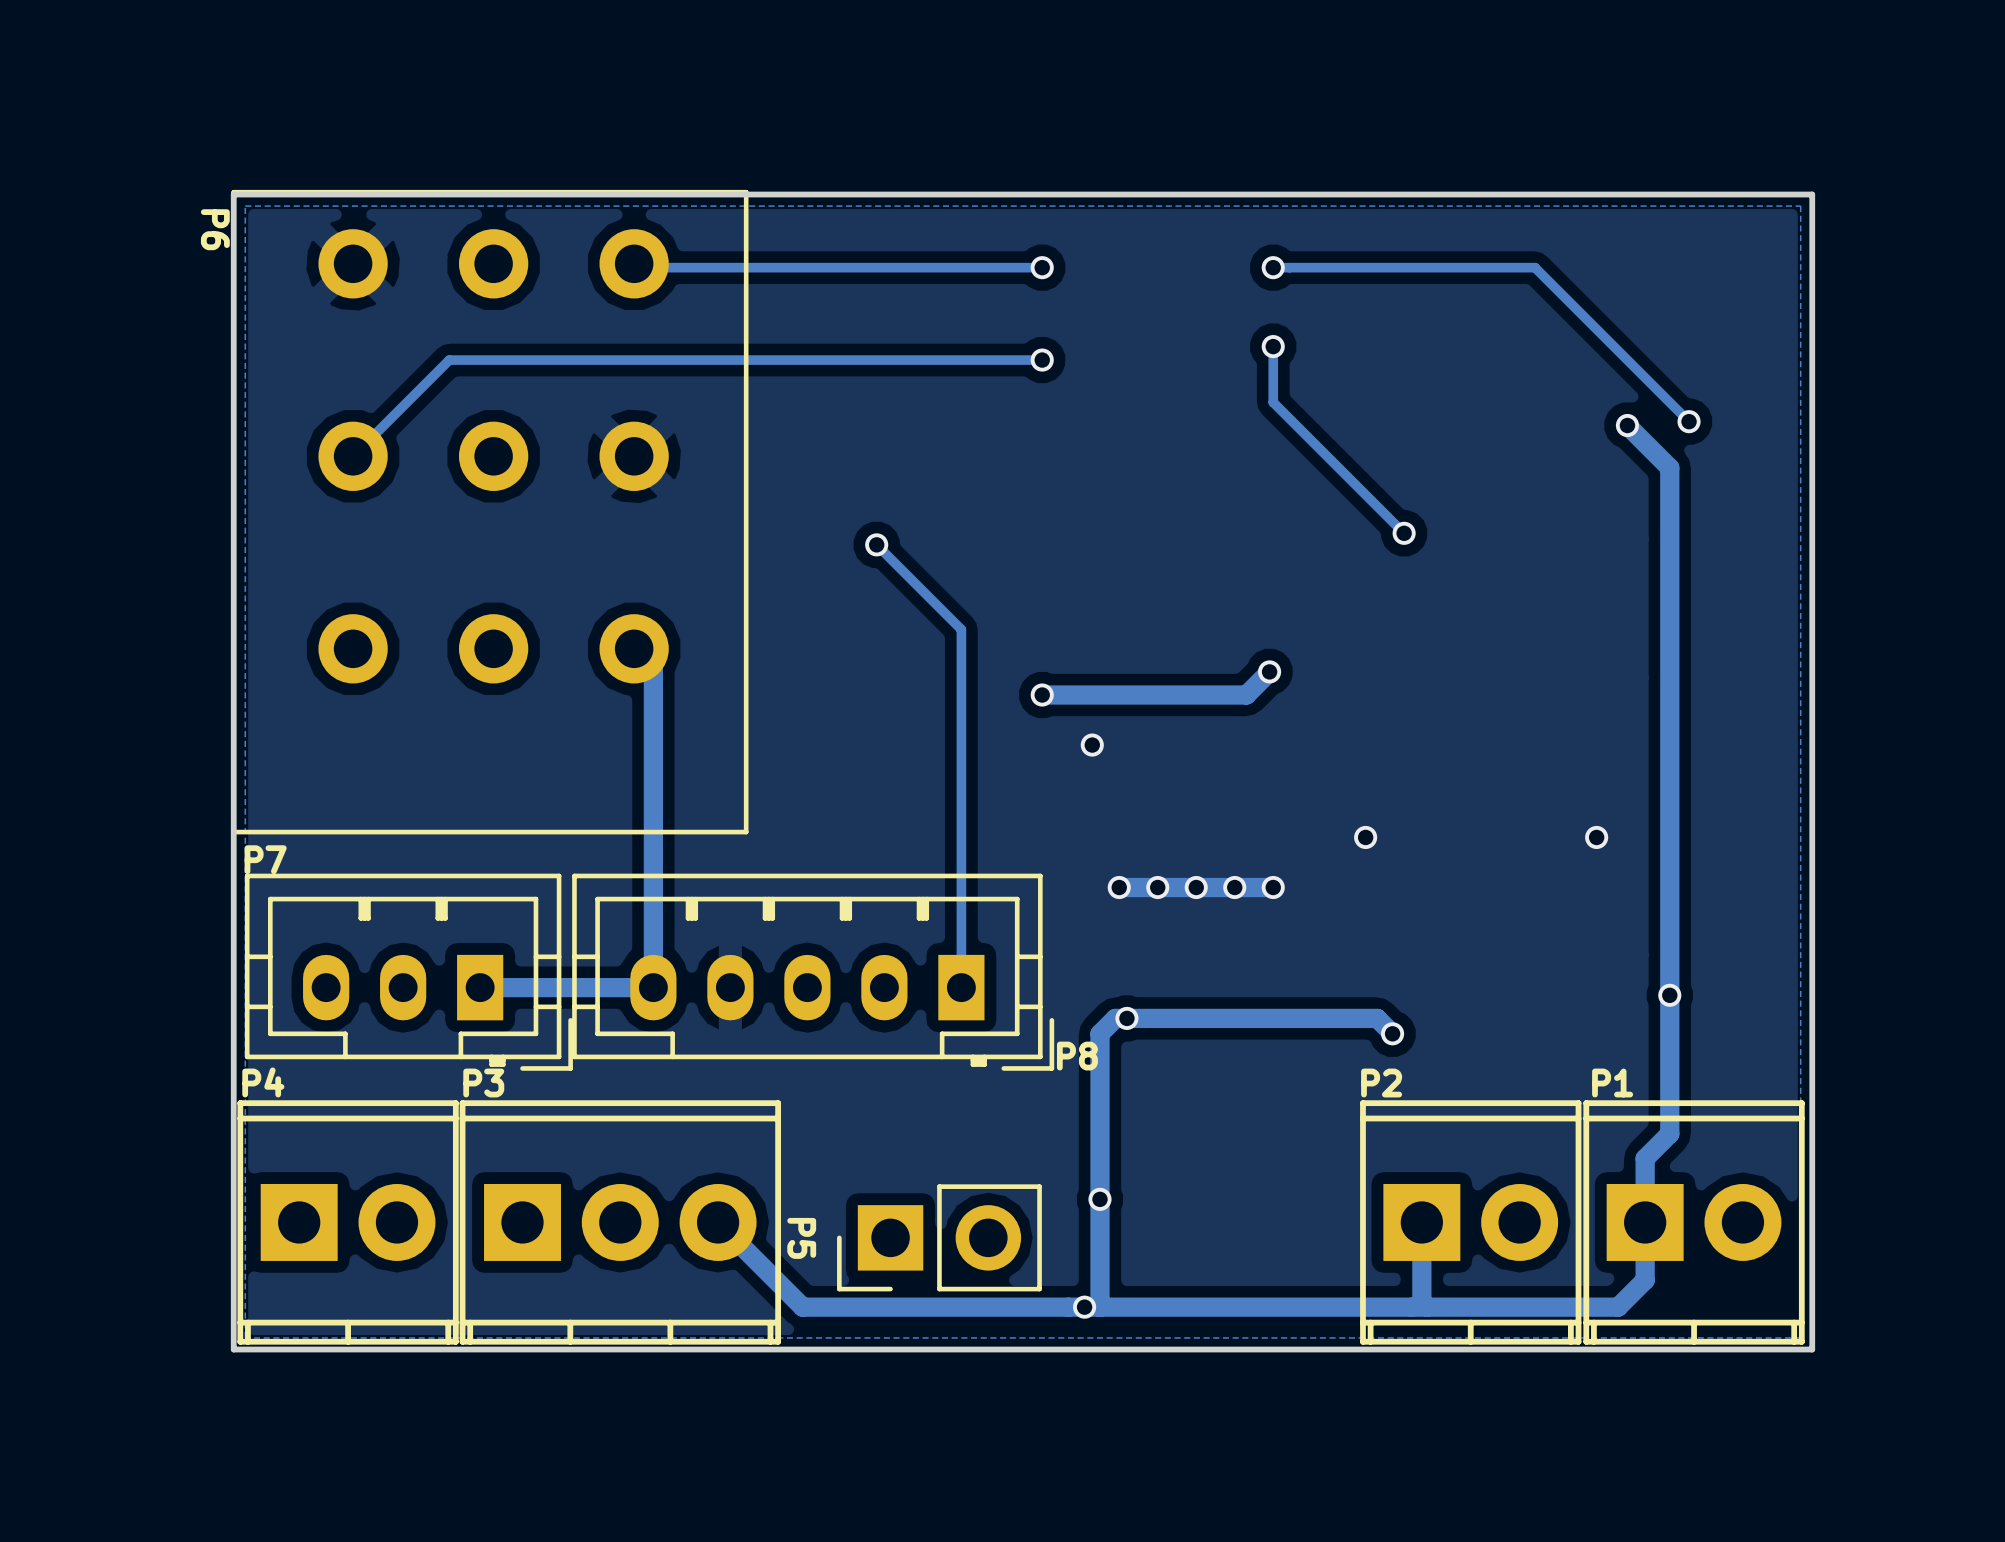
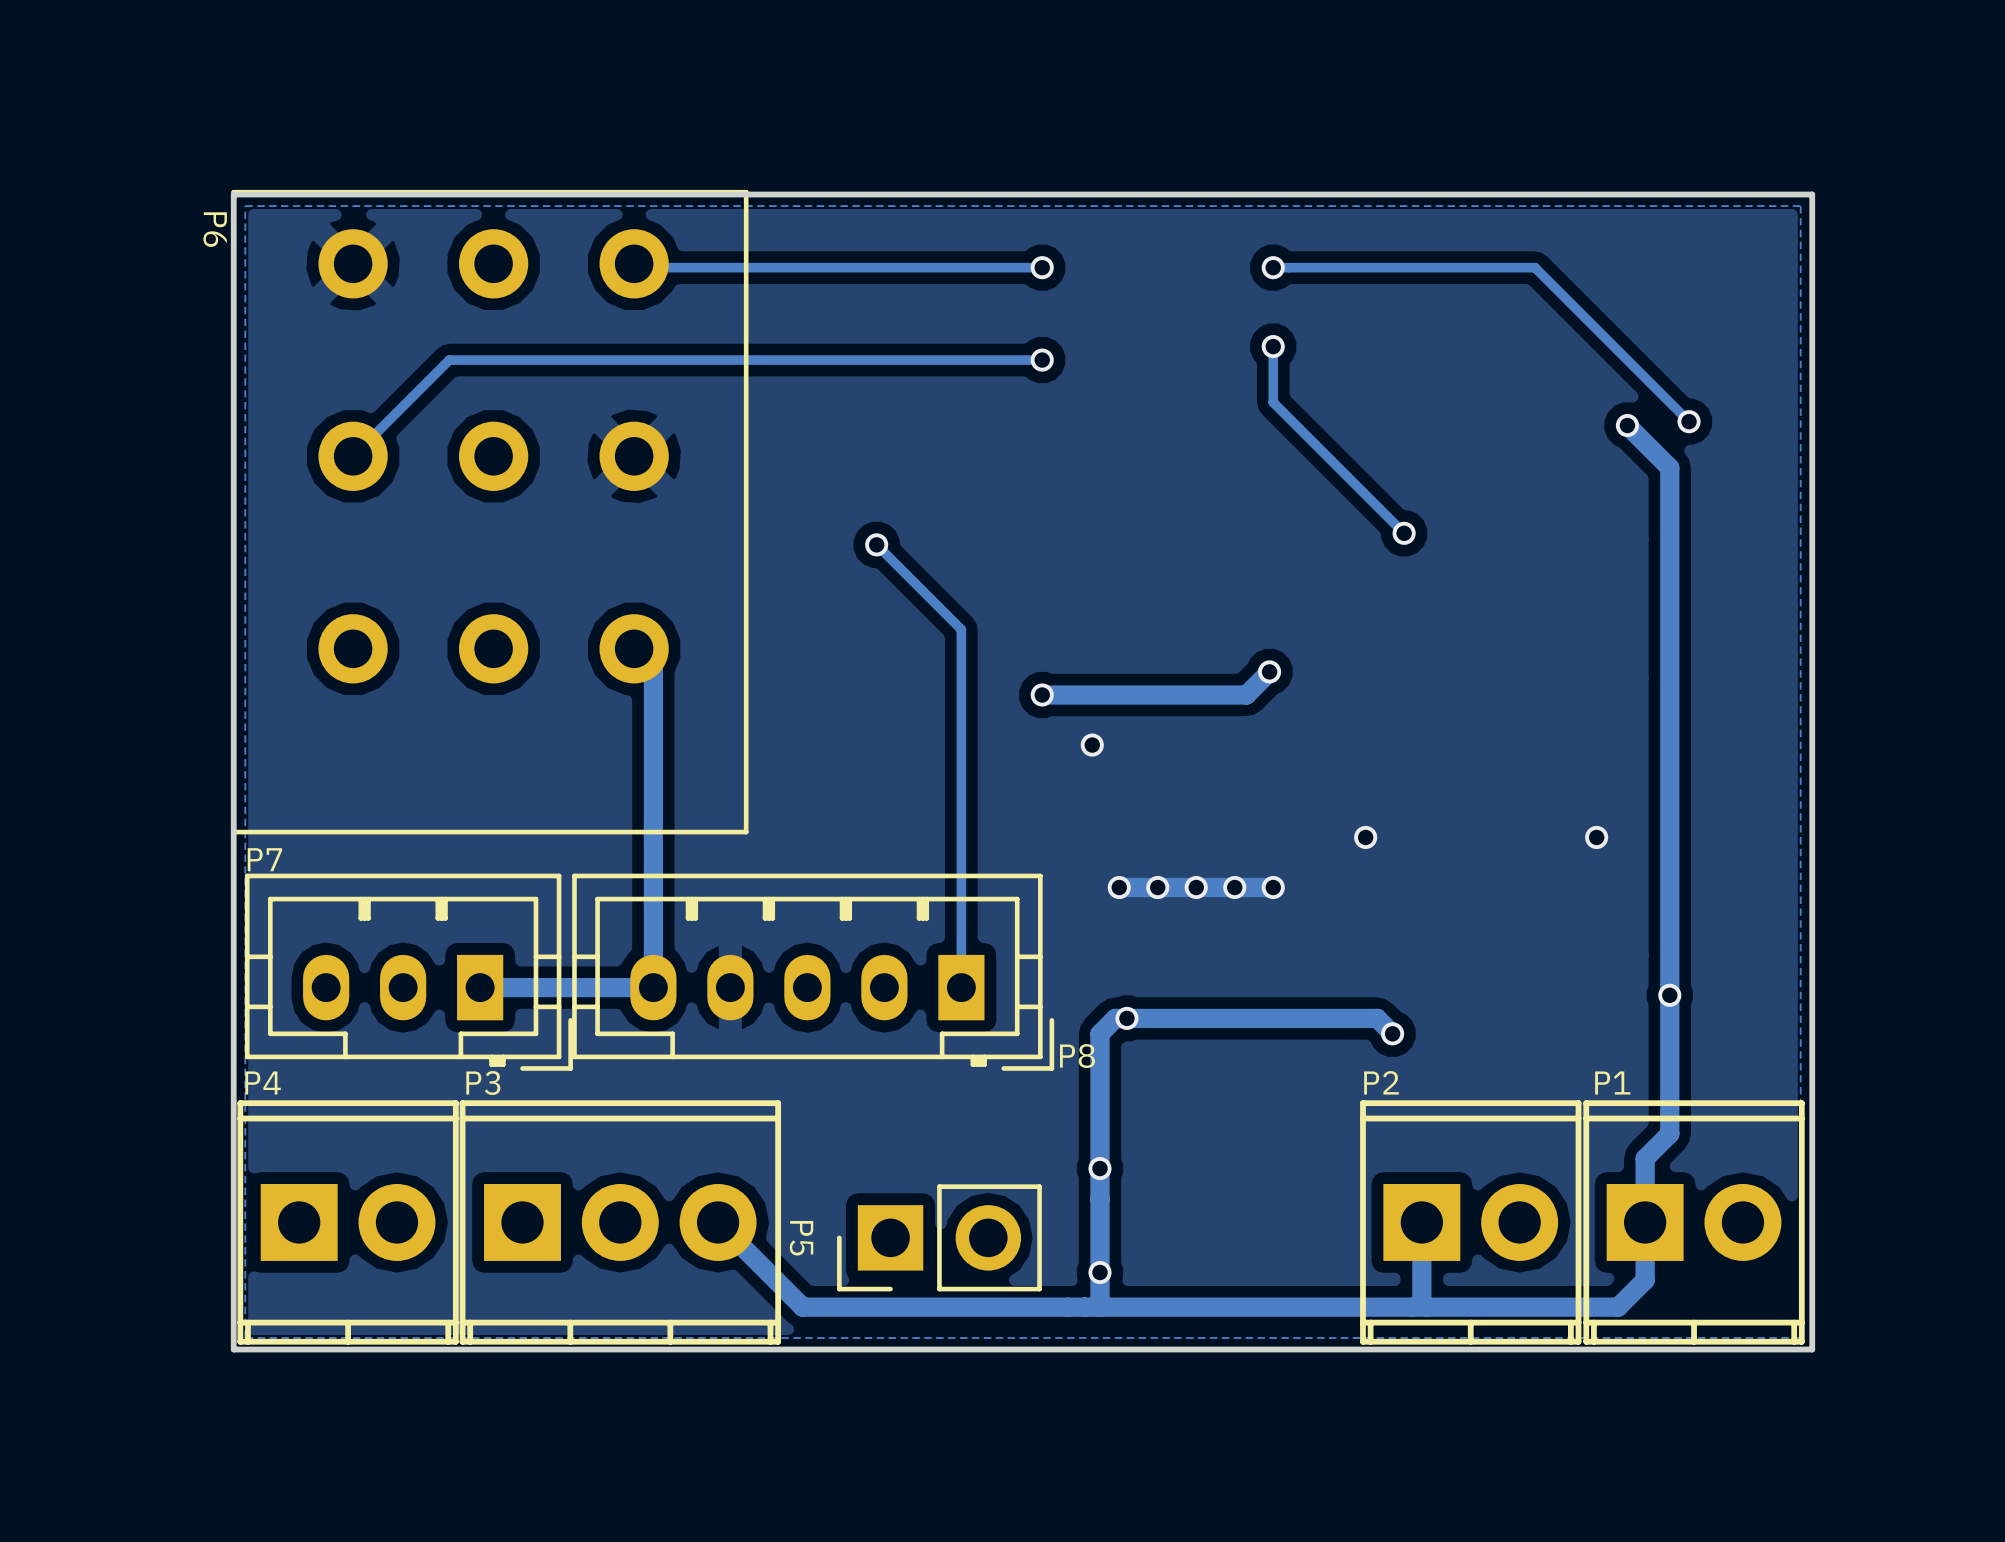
via position: (1099, 1199) -> (1099, 1168)
via: none -> (1099, 1272)
via: (1084, 1307) -> none

